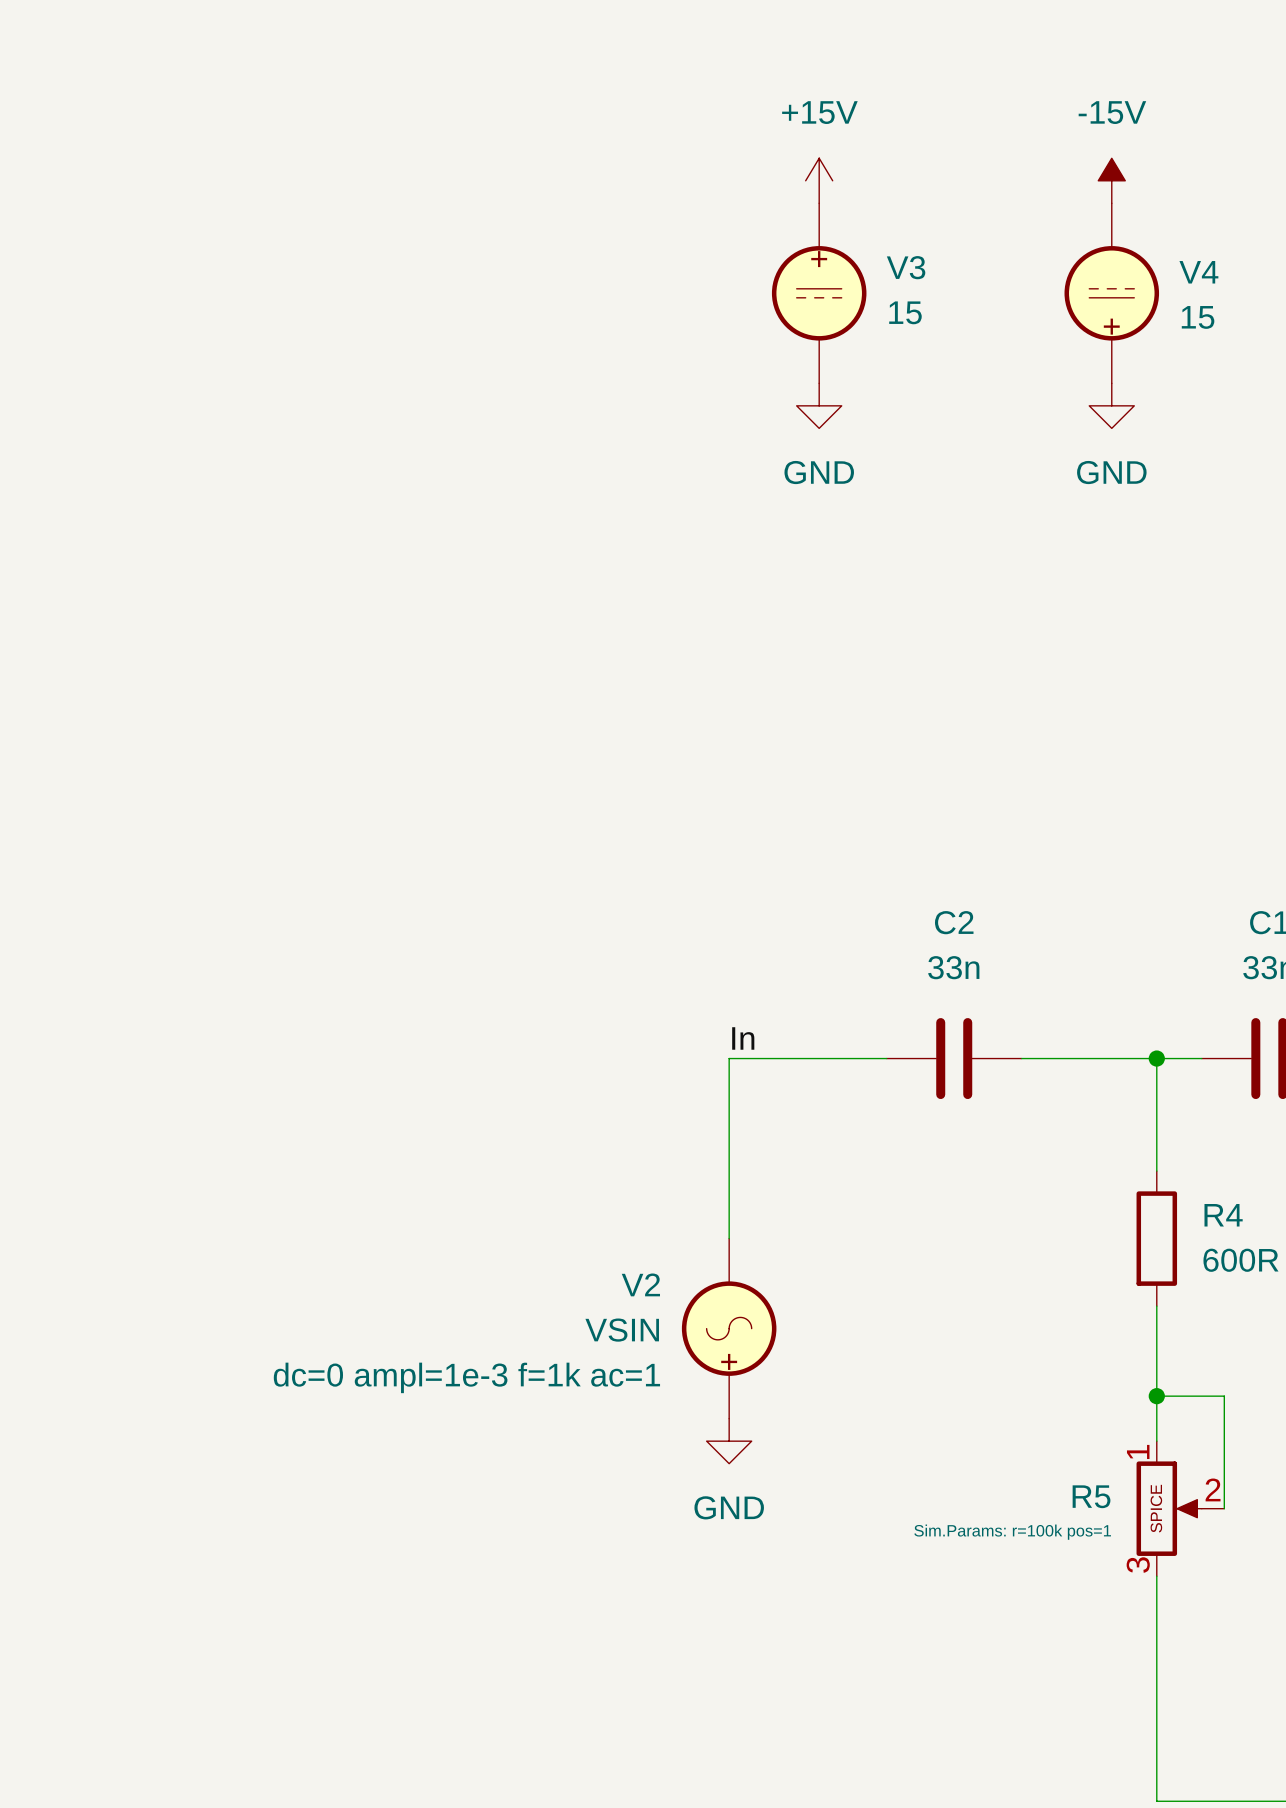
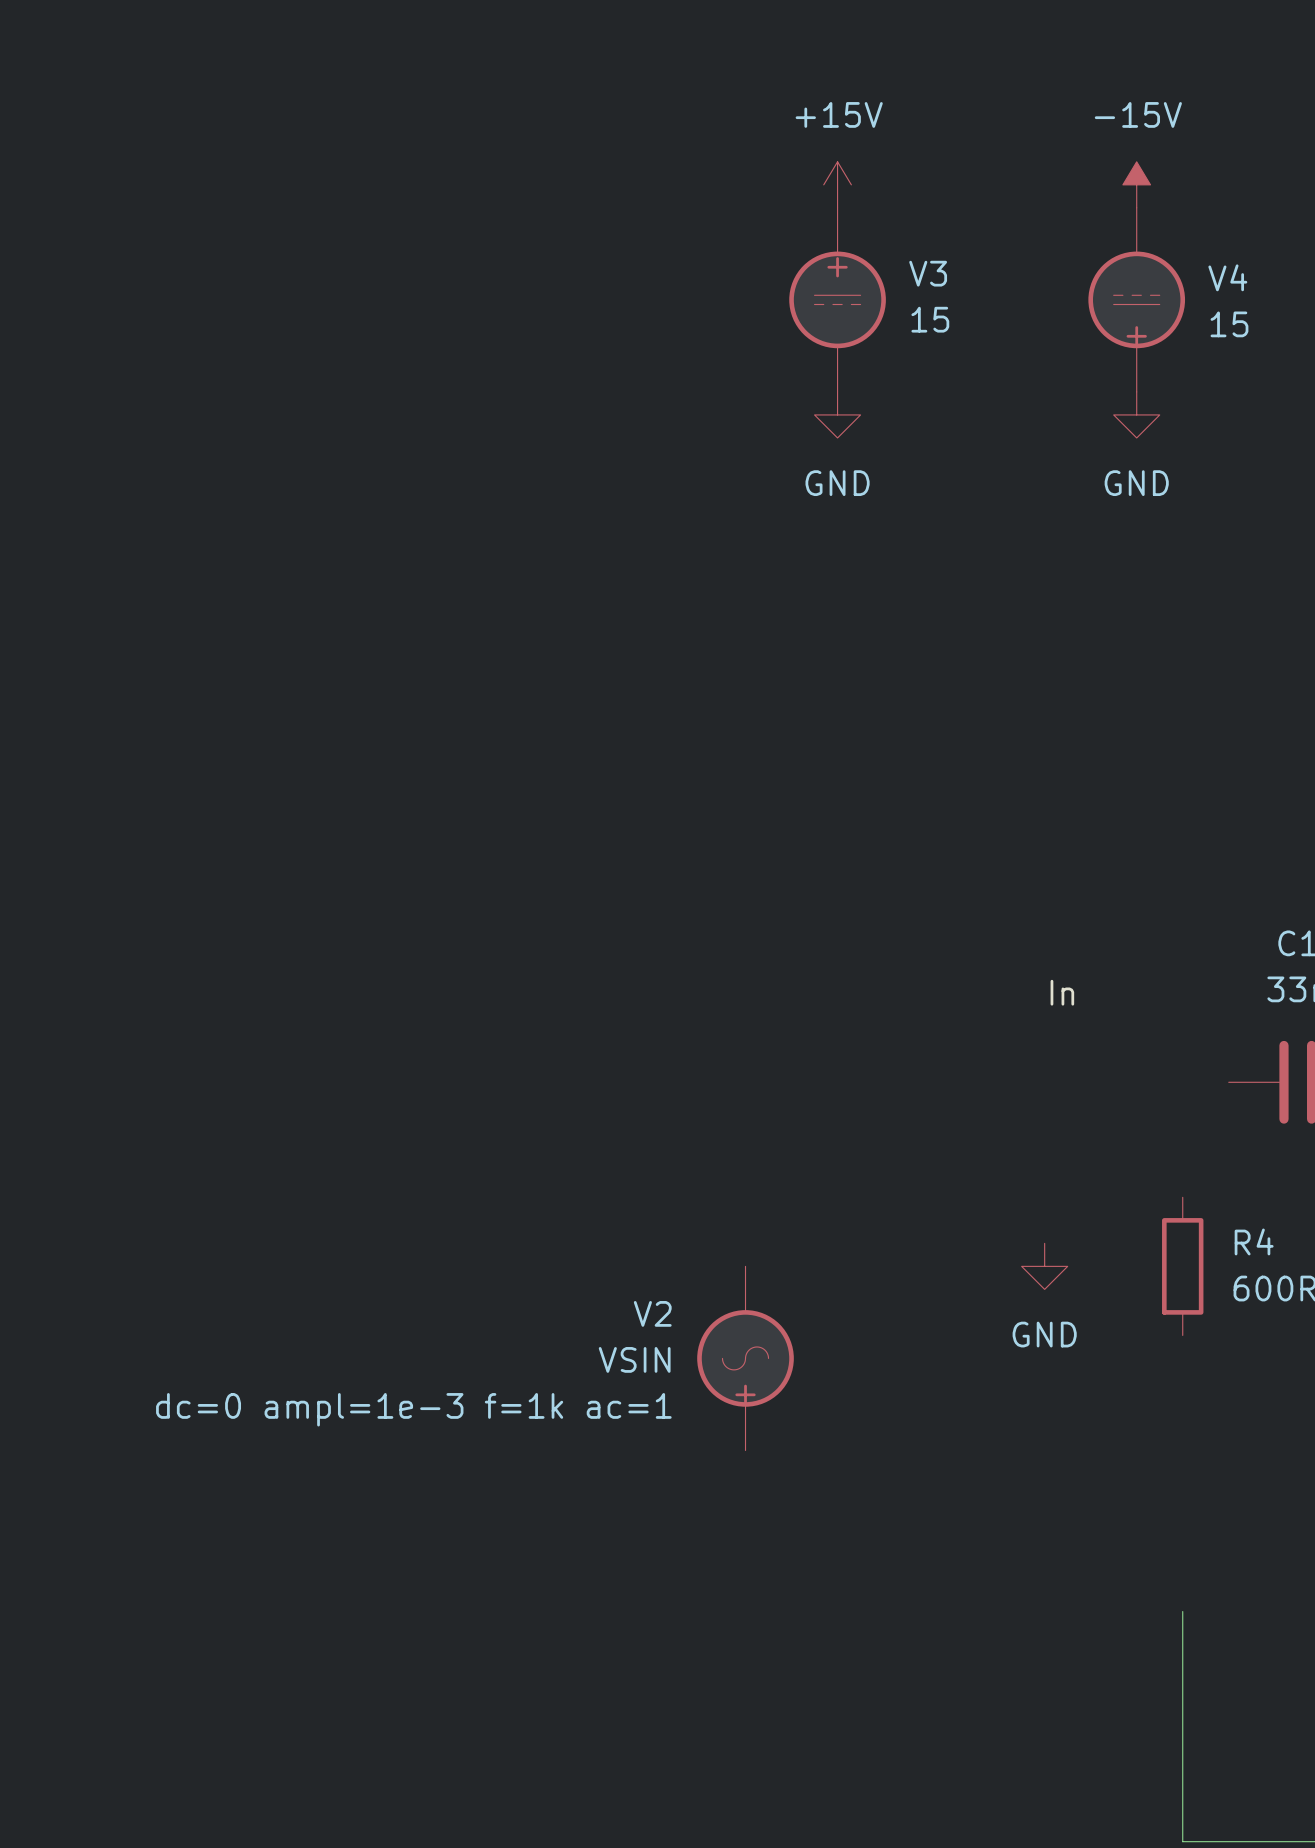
label position: In (743, 1038) -> In (1062, 992)
wire: (886, 1058) (729, 1058) (729, 1238) -> none
C2: 33n (954, 1058) -> none
wire: (1021, 1058) (1201, 1058) -> none
wire: (1156, 1058) (1156, 1171) -> none
junction: (1156, 1058) -> none
power symbol: none -> GND (1044, 1266)
wire: (1156, 1306) (1156, 1441) -> none
wire: (1156, 1396) (1224, 1396) (1224, 1508) -> none
junction: (1156, 1396) -> none
power symbol: GND (729, 1441) -> none
R5: (1180, 1508) -> none

